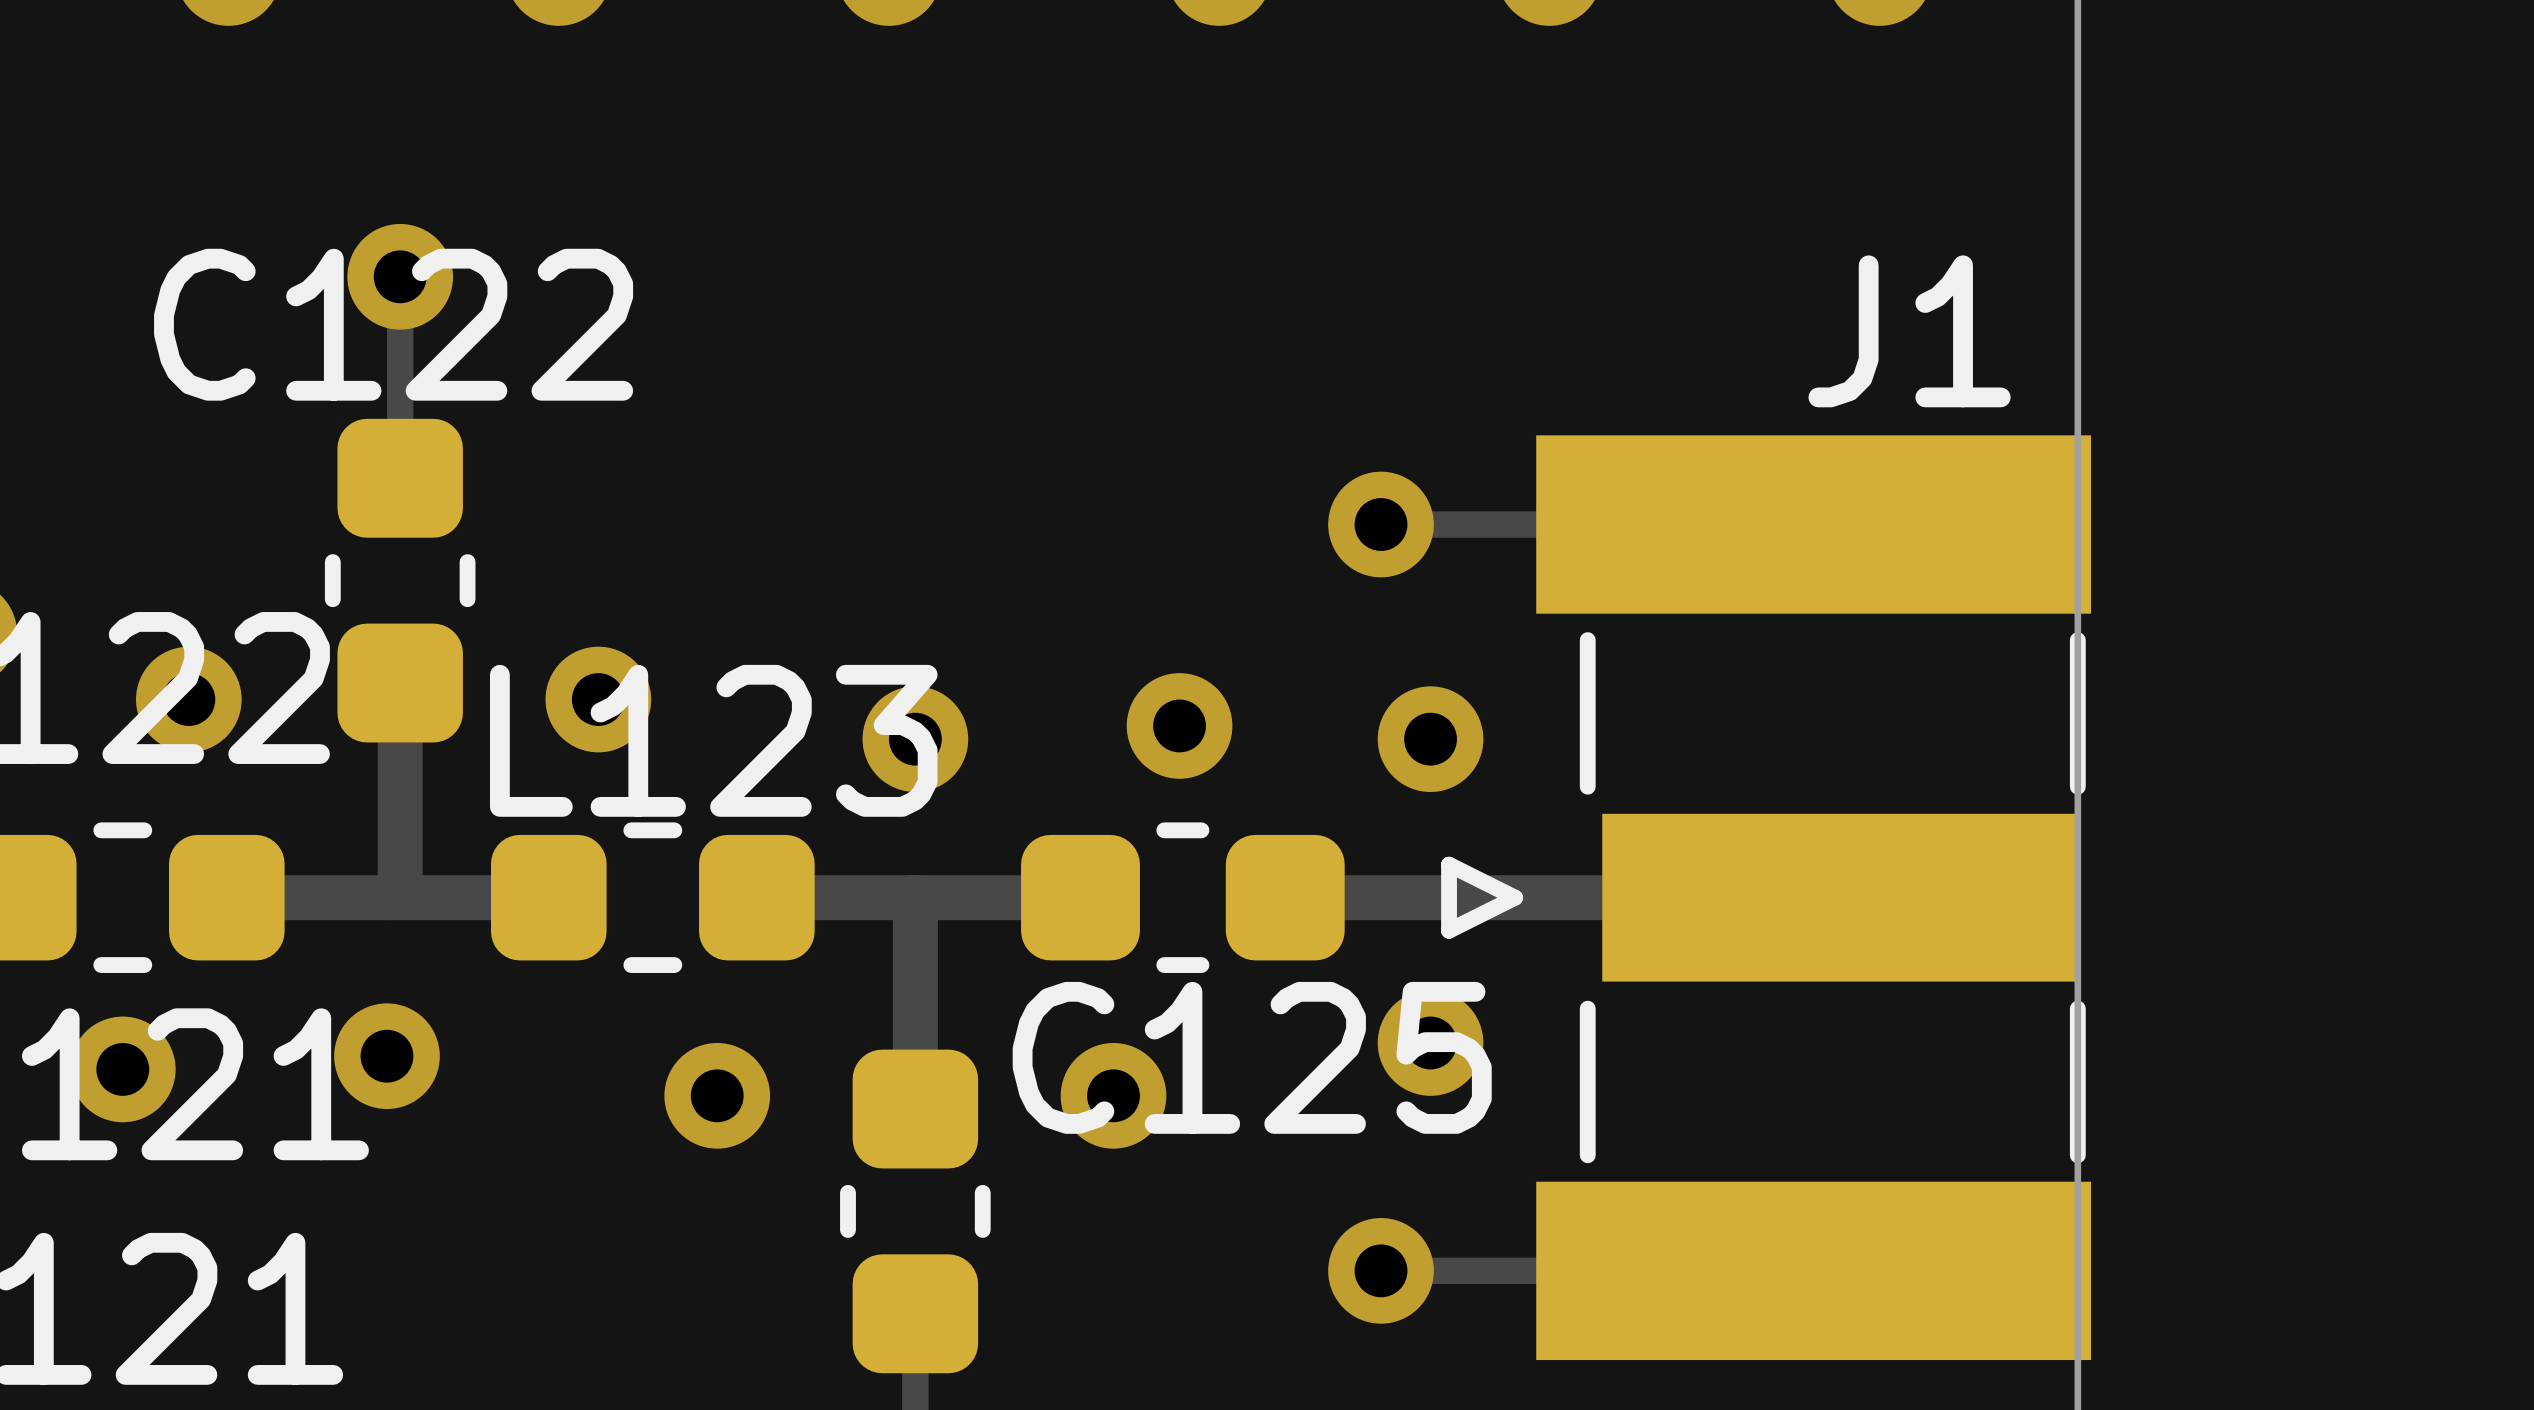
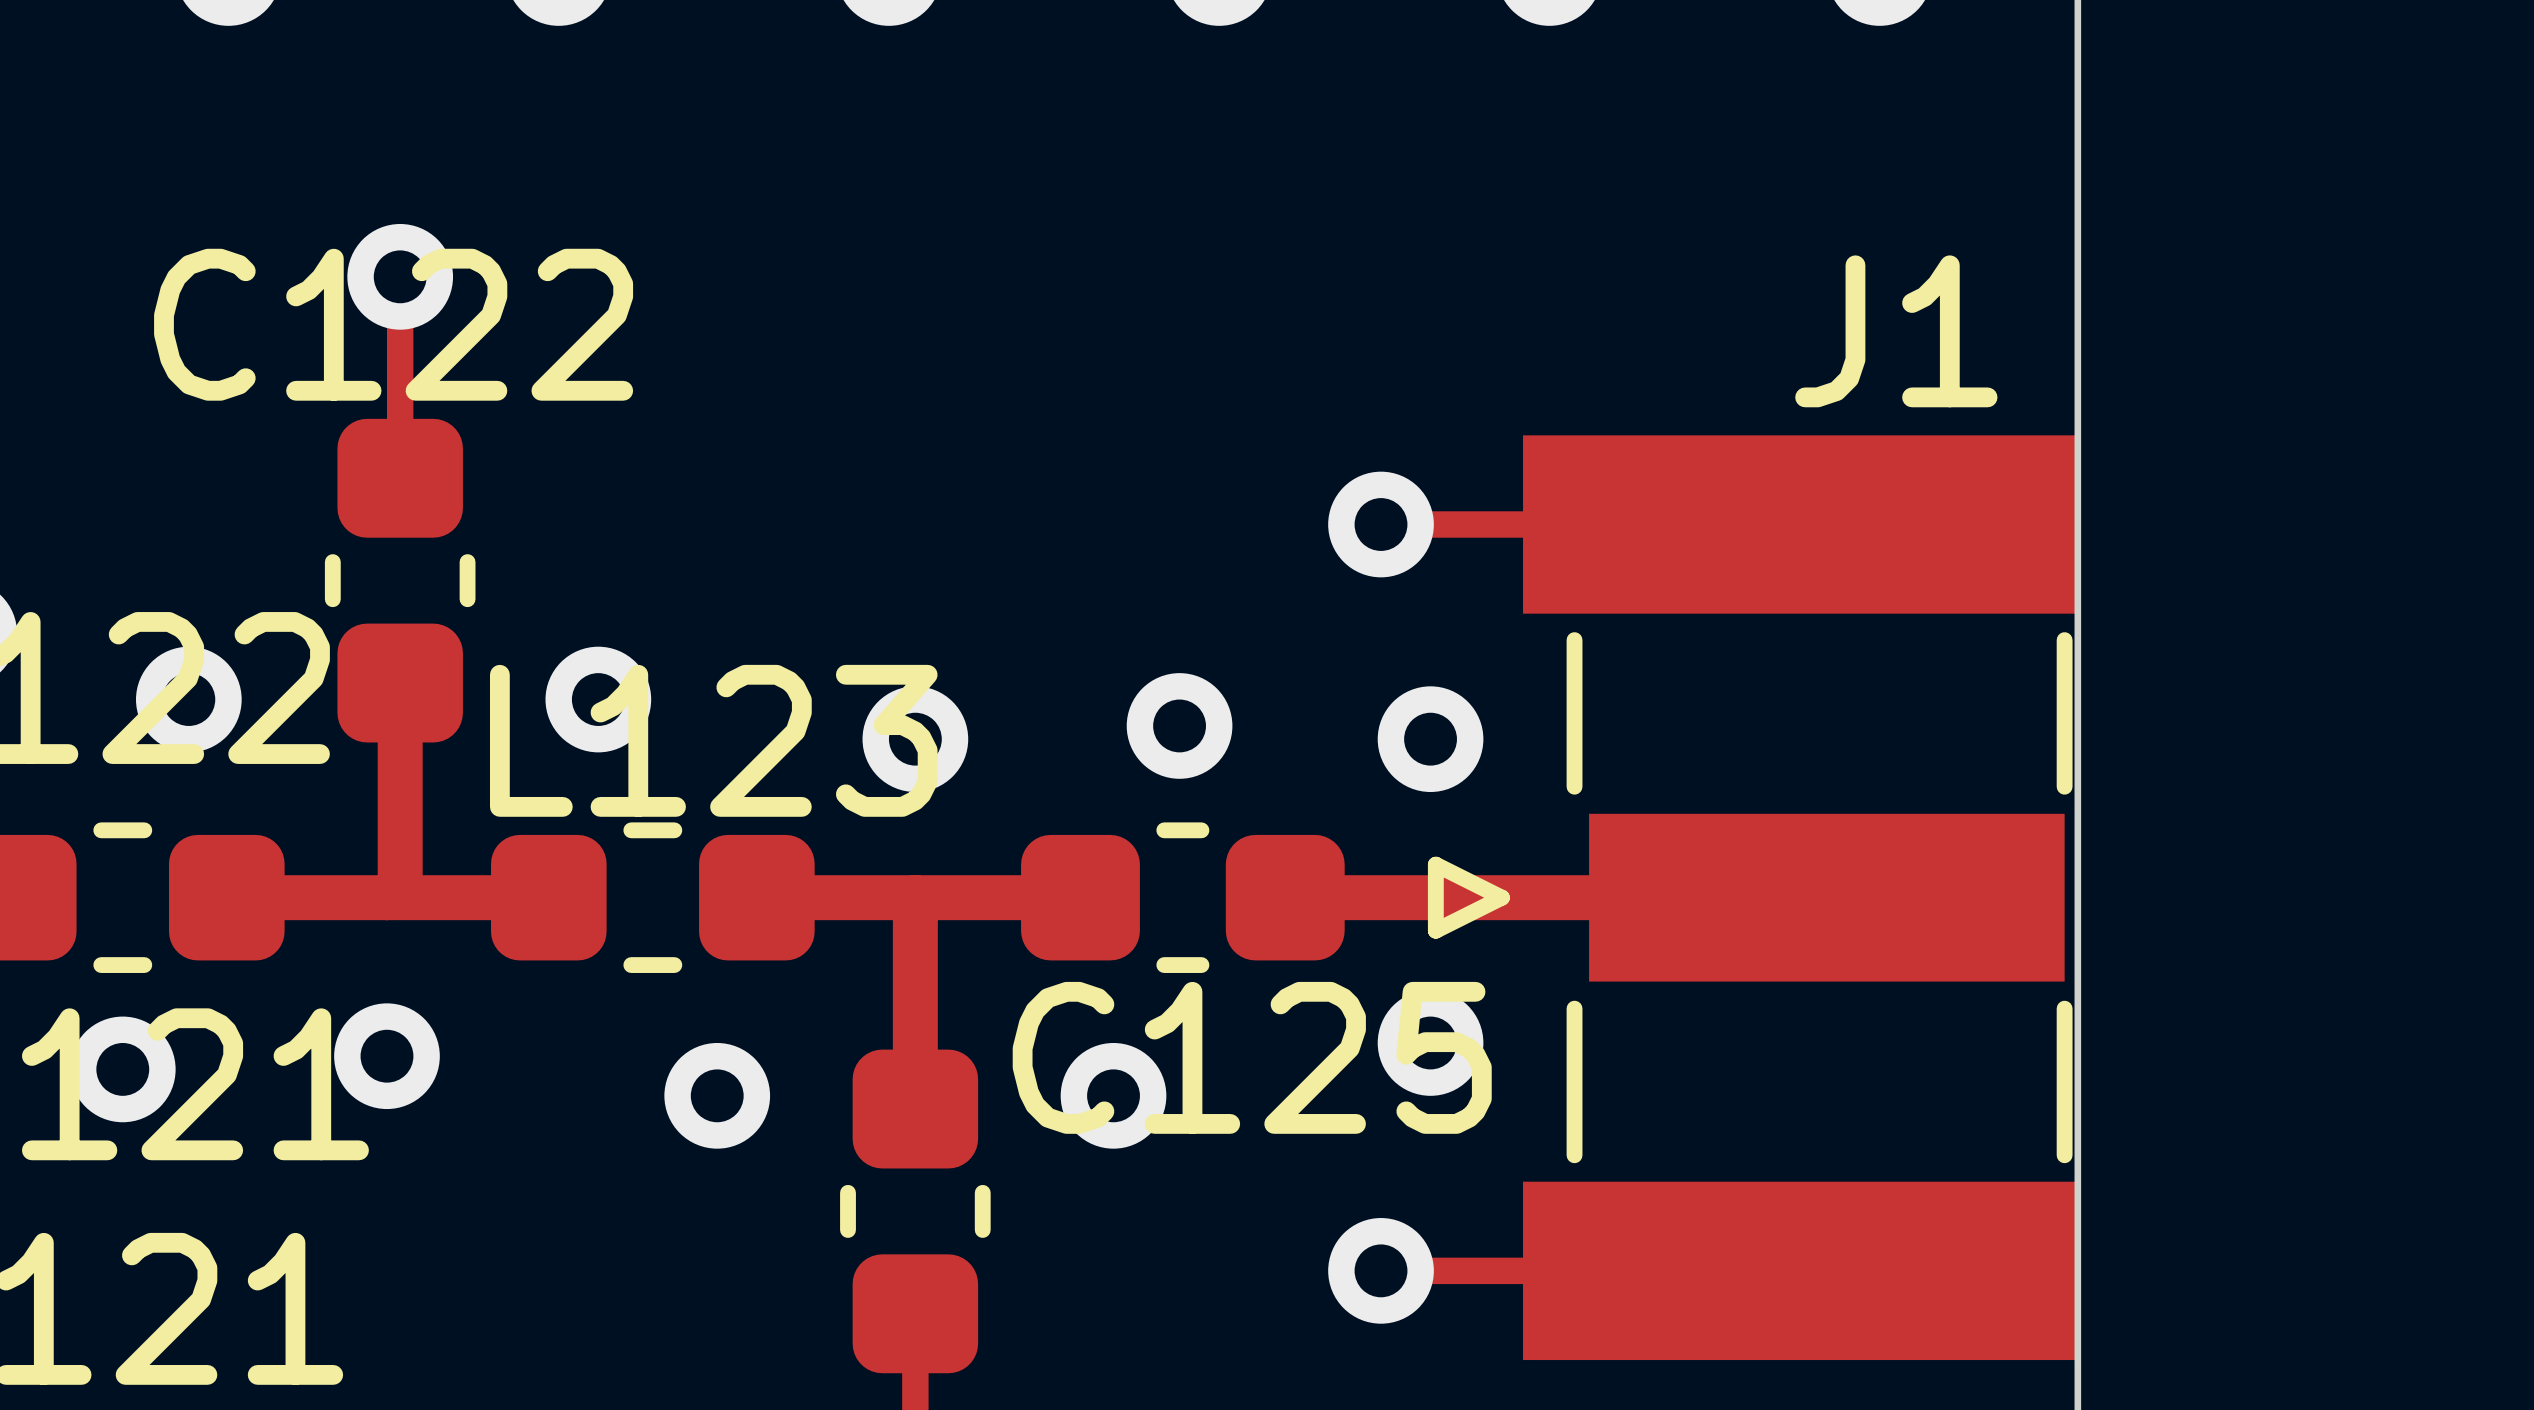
J1 position: (1766, 897) -> (1752, 897)

